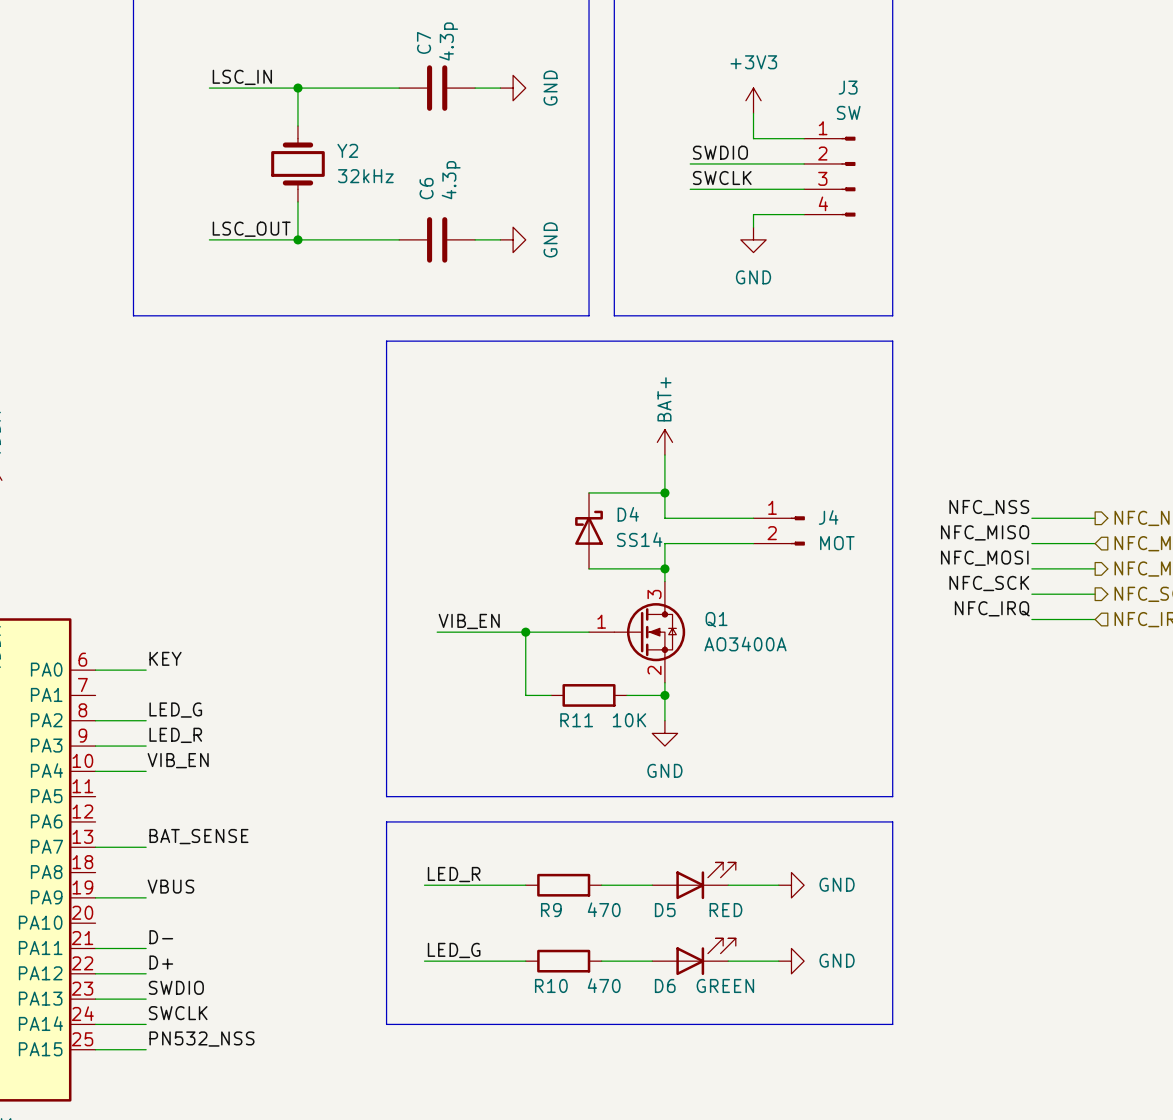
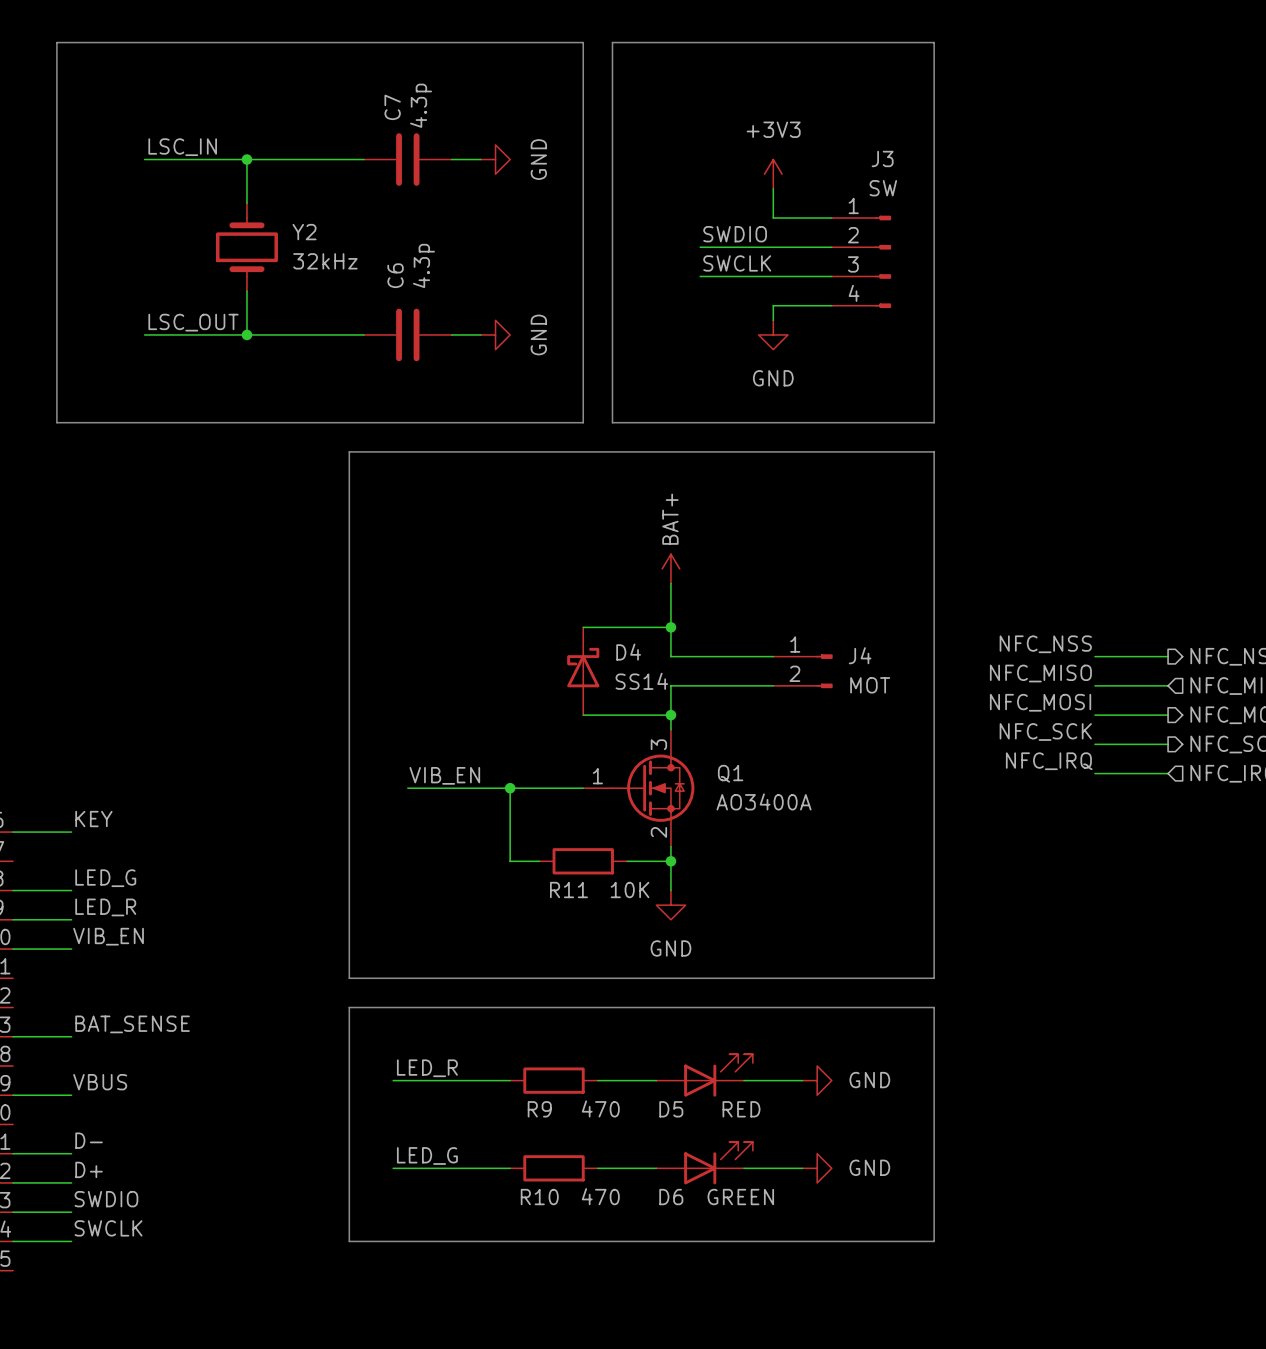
label: PN532_NSS (201, 1039) -> none
wire: (95, 1049) (146, 1049) -> none

